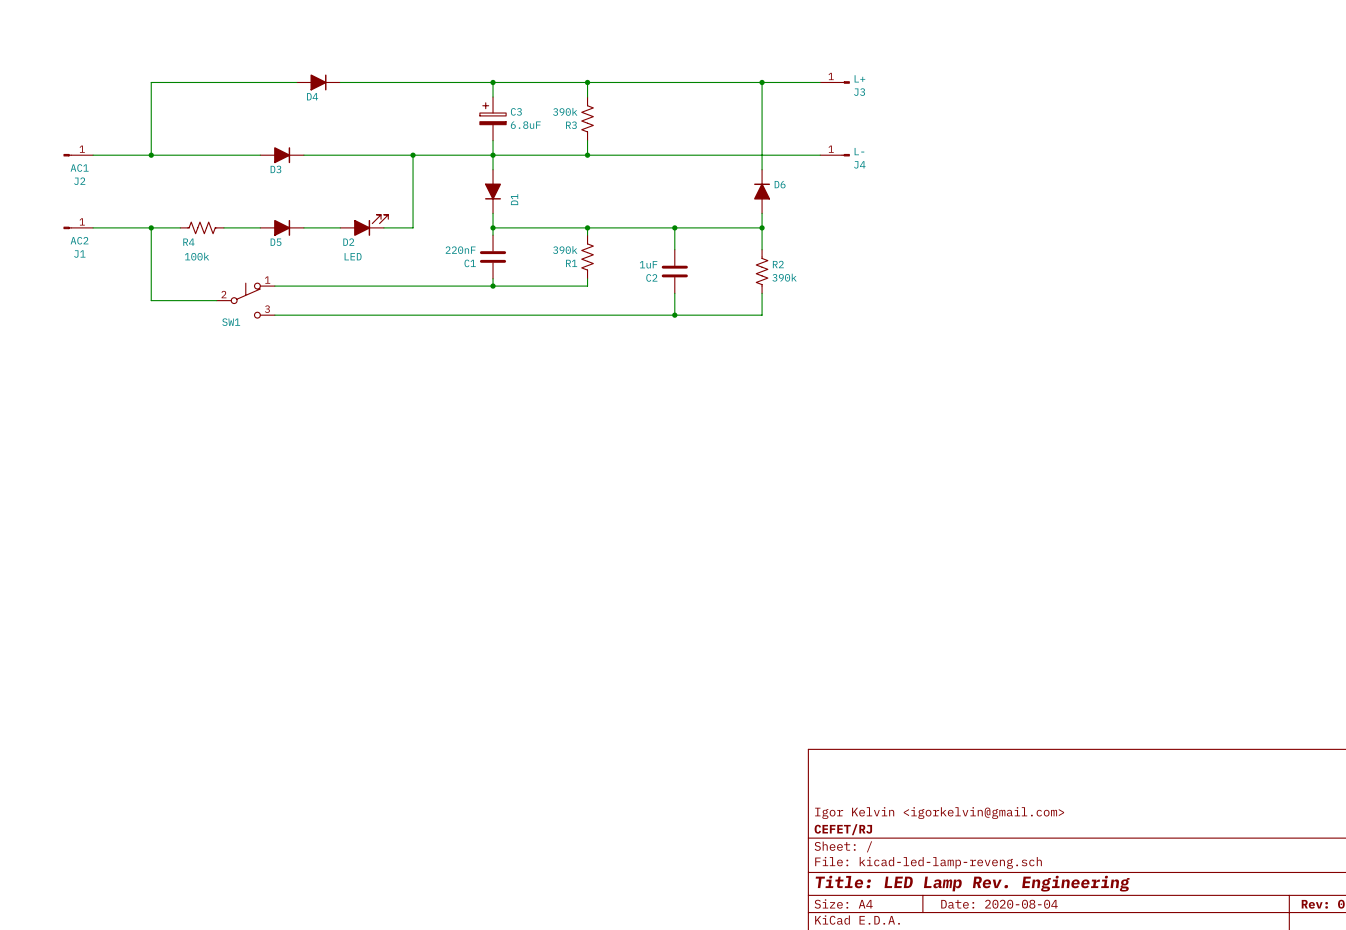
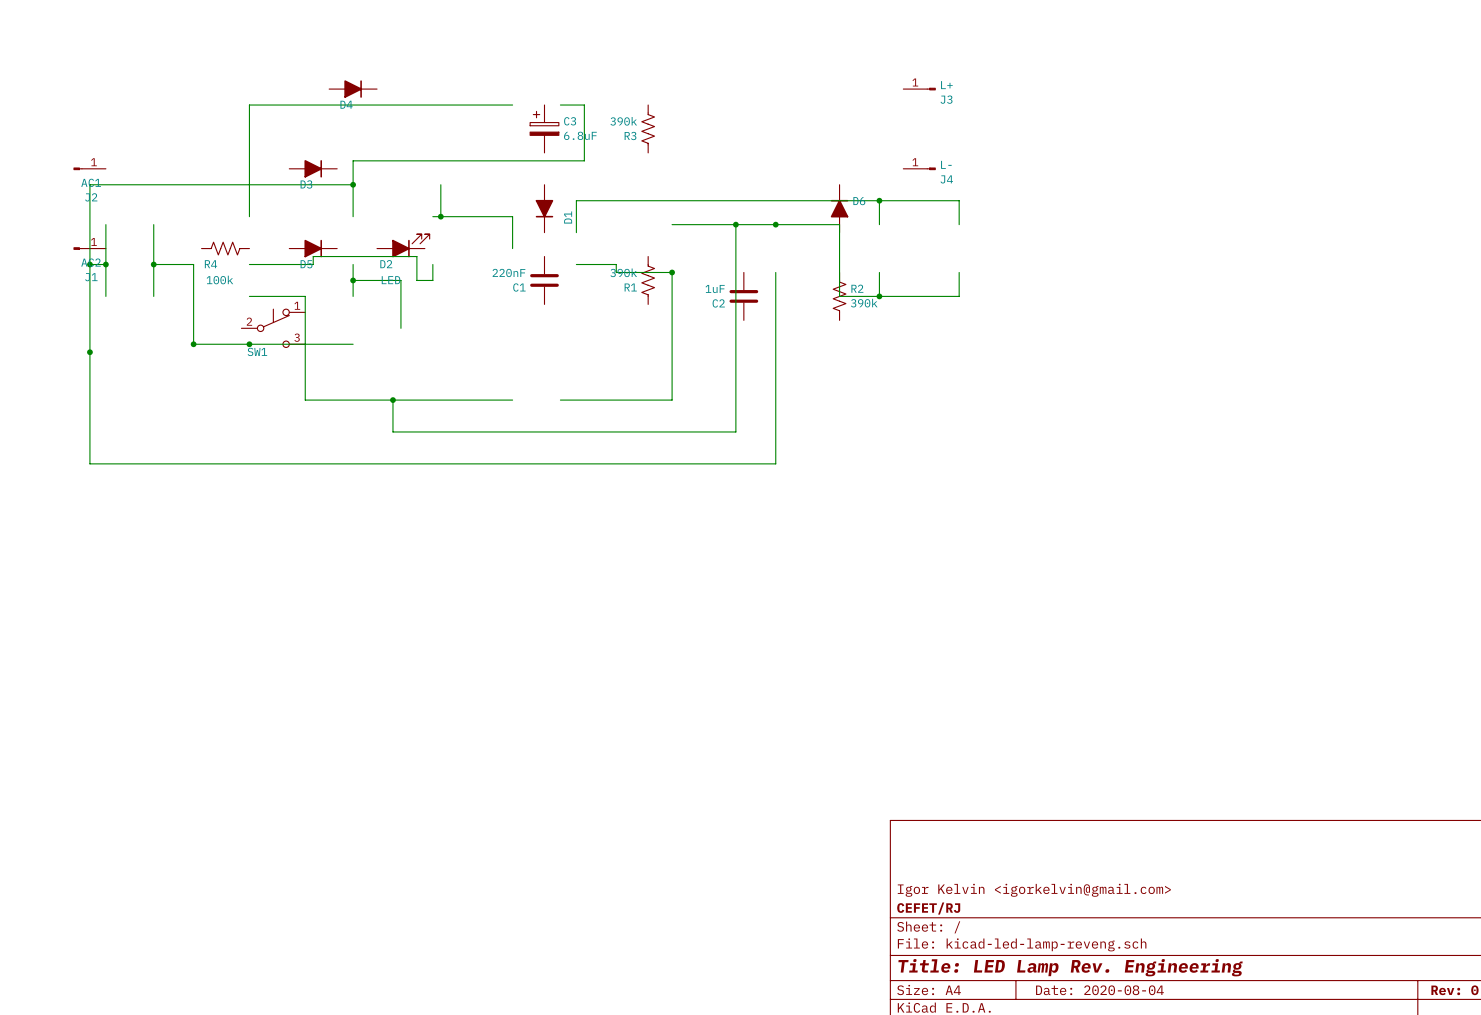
wire: (296, 82) (151, 82) (151, 155) -> none
wire: (340, 82) (820, 82) -> none
wire: (493, 82) (493, 97) -> none
junction: (493, 82) -> none
wire: (587, 82) (587, 97) -> none
junction: (587, 82) -> none
wire: (762, 82) (762, 169) -> none
junction: (762, 82) -> none
wire: none -> (512, 105) (249, 105) (249, 216)
wire: none -> (560, 105) (584, 105) (584, 160) (353, 160) (353, 216)
wire: (493, 140) (493, 169) -> (440, 184) (440, 216)
wire: (587, 140) (587, 155) -> none
wire: (93, 155) (260, 155) -> none
junction: (151, 155) -> none
wire: (303, 155) (820, 155) -> none
wire: (413, 155) (413, 227) (383, 227) -> none
junction: (413, 155) -> none
junction: (493, 155) -> none
junction: (587, 155) -> none
wire: none -> (353, 184) (89, 184) (89, 463) (775, 463) (775, 272)
junction: none -> (353, 184)
junction: none -> (879, 200)
wire: none -> (432, 216) (512, 216) (512, 248)
junction: none -> (440, 216)
wire: none -> (105, 224) (105, 296)
wire: none -> (153, 224) (153, 296)
wire: none -> (672, 224) (839, 224) (839, 232)
wire: none -> (735, 224) (735, 431) (392, 431) (392, 400)
junction: none -> (735, 224)
junction: none -> (775, 224)
wire: none -> (959, 224) (959, 200) (576, 200) (576, 232)
wire: (493, 213) (493, 235) -> none
wire: (93, 227) (180, 227) -> none
wire: (151, 227) (151, 300) (216, 300) -> none
junction position: (151, 227) -> (153, 264)
wire: (223, 227) (260, 227) -> none
wire: (303, 227) (340, 227) -> none
wire: (493, 227) (762, 227) -> none
junction: (493, 227) -> none
wire: (587, 227) (587, 235) -> none
junction position: (587, 227) -> (672, 272)
wire: (674, 227) (674, 249) -> (879, 200) (879, 224)
junction: (674, 227) -> none
junction: (762, 227) -> none
wire: none -> (89, 264) (105, 264)
junction: none -> (89, 264)
junction: none -> (105, 264)
wire: none -> (153, 264) (193, 264) (193, 344) (305, 344)
wire: none -> (249, 264) (313, 264) (313, 256) (416, 256) (416, 280) (432, 280) (432, 264)
wire: none -> (353, 264) (353, 296)
wire: none -> (576, 264) (616, 264) (616, 272) (672, 272) (672, 400) (560, 400)
wire: none -> (839, 272) (839, 296) (959, 296) (959, 272)
wire: none -> (353, 280) (400, 280) (400, 328)
junction: none -> (353, 280)
wire: none -> (249, 296) (305, 296) (305, 400) (512, 400)
junction: none -> (879, 296)
wire: (493, 278) (493, 286) -> none
wire: (587, 278) (587, 286) (274, 286) -> none
junction: (493, 286) -> none
wire: (674, 293) (674, 315) -> (879, 272) (879, 296)
wire: (762, 293) (762, 315) (318, 315) -> none
junction: none -> (193, 344)
junction: none -> (249, 344)
junction: (674, 315) -> none
junction: none -> (89, 352)
junction: none -> (392, 400)

